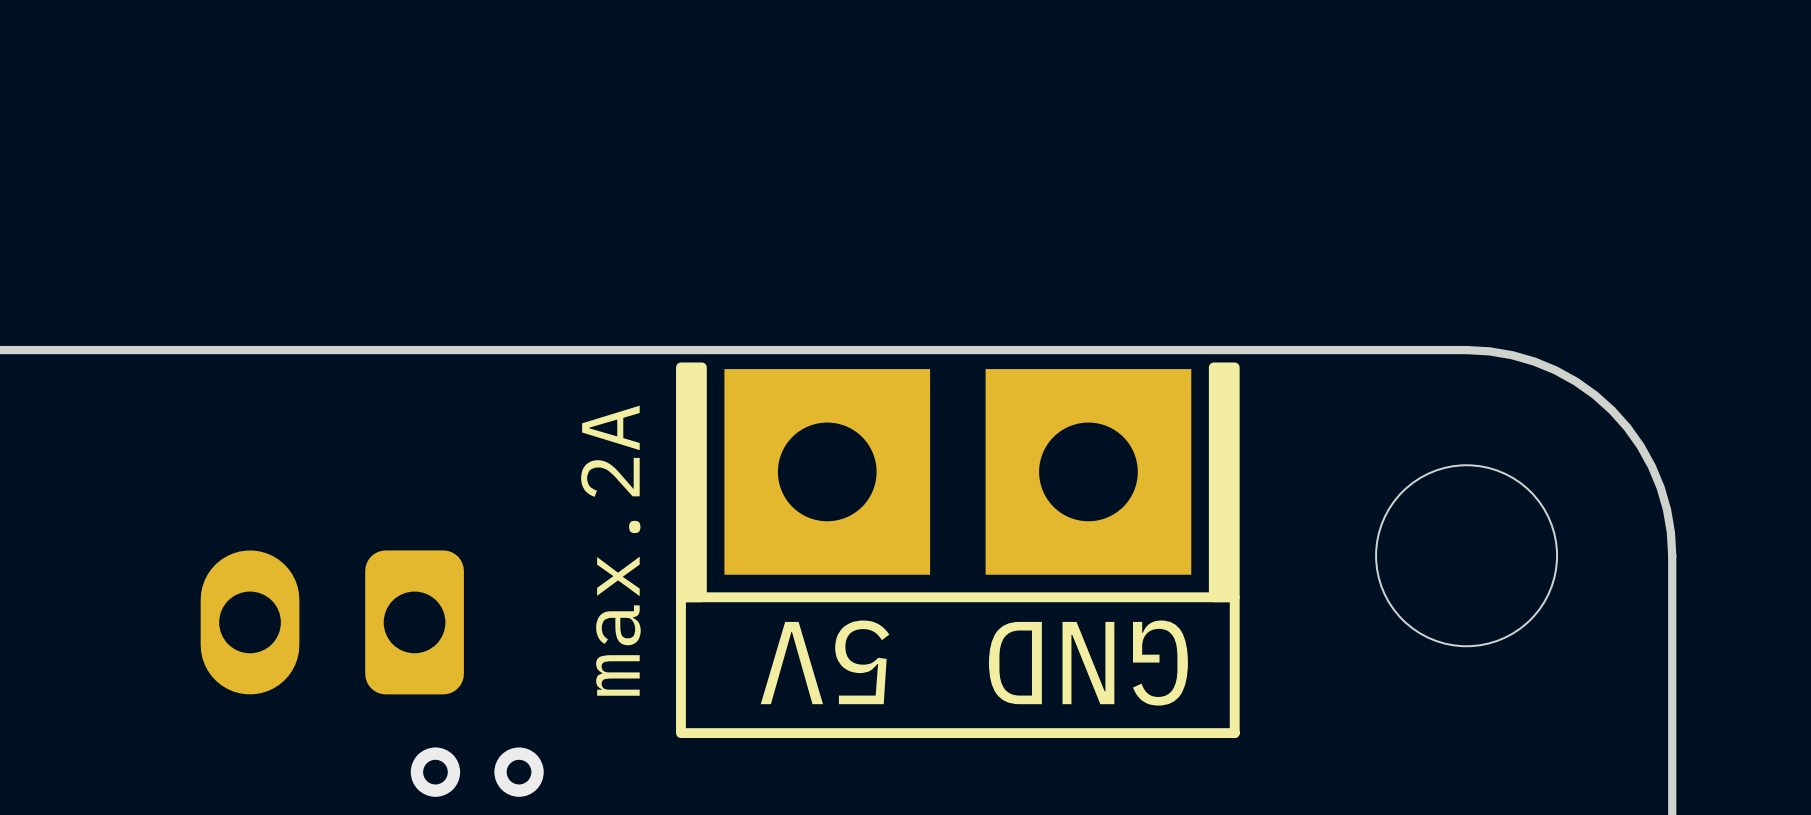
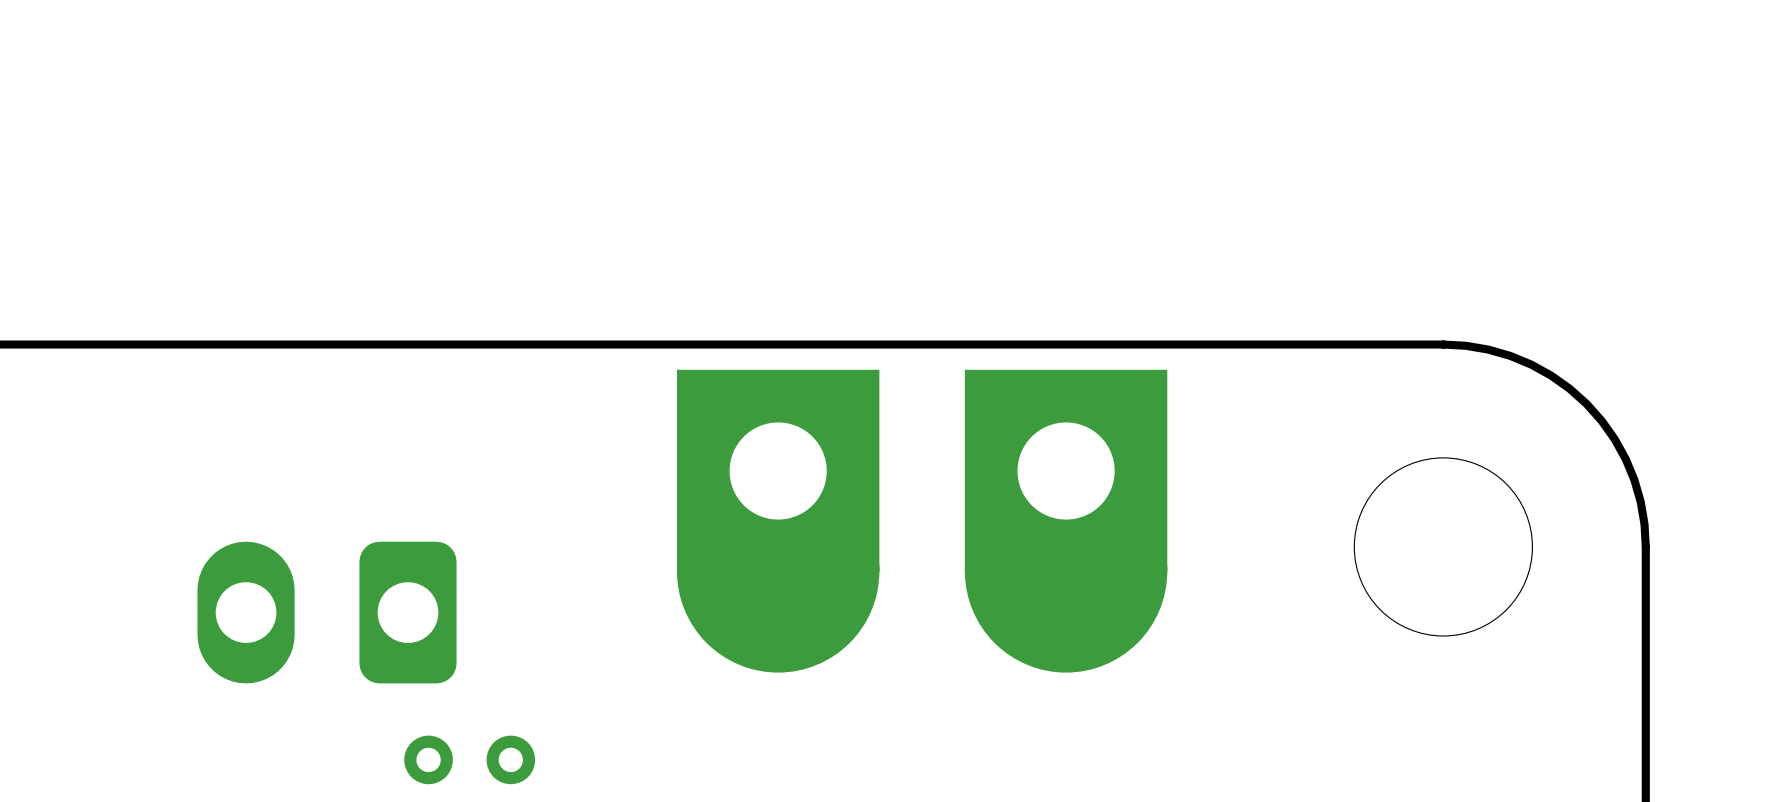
part: none -> (778, 521)
part: none -> (1066, 521)
text: max.2A (610, 550) -> none
part: (957, 550) -> none

